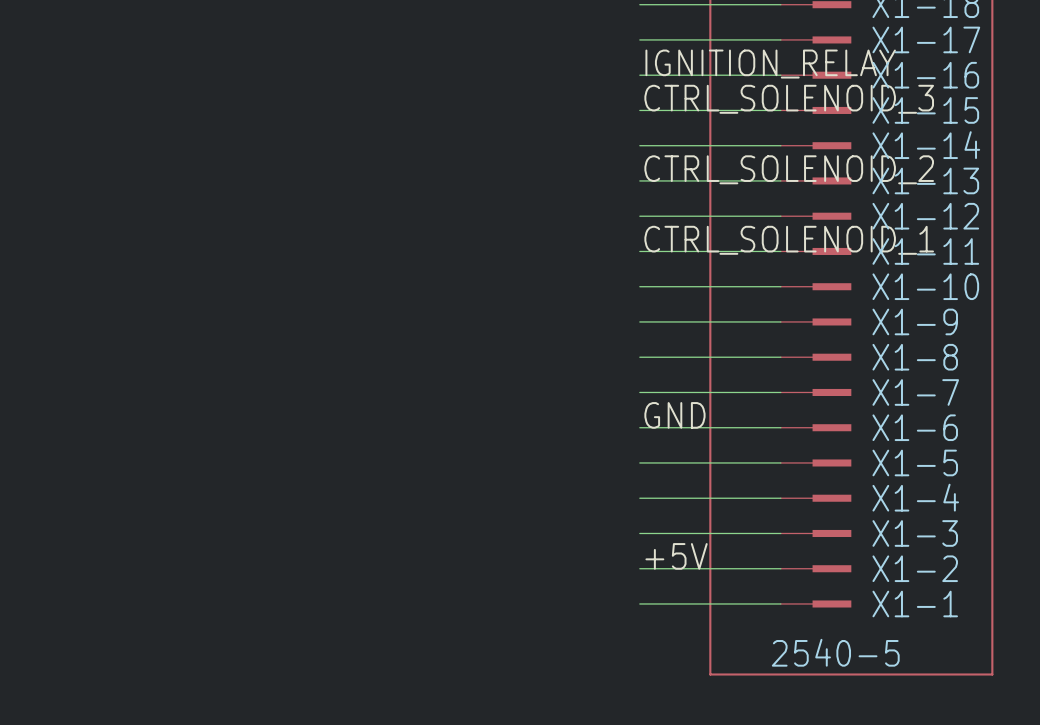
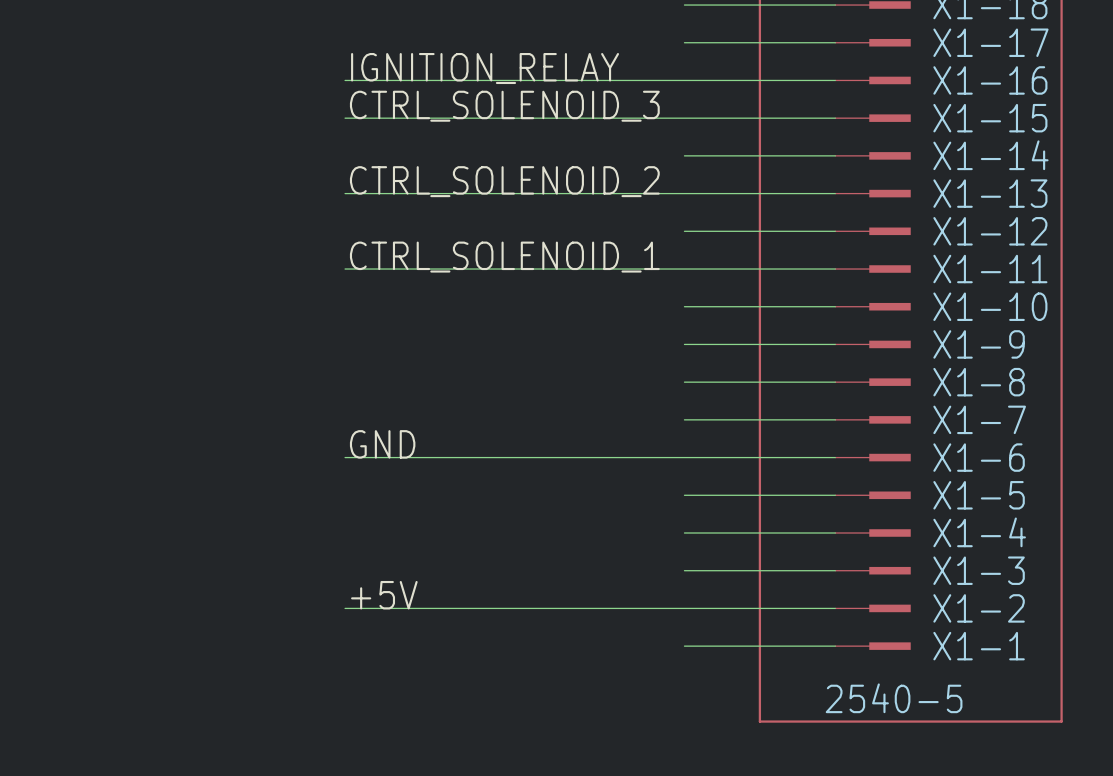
label position: IGNITION_RELAY (770, 64) -> IGNITION_RELAY (485, 68)
wire: none -> (345, 80) (684, 80)
label position: CTRL_SOLENOID_3 (789, 99) -> CTRL_SOLENOID_3 (504, 106)
wire: none -> (345, 118) (684, 118)
label position: CTRL_SOLENOID_2 (789, 169) -> CTRL_SOLENOID_2 (504, 181)
wire: none -> (345, 193) (684, 193)
label position: CTRL_SOLENOID_1 (789, 240) -> CTRL_SOLENOID_1 (504, 257)
wire: none -> (345, 269) (684, 269)
label position: GND (674, 415) -> GND (382, 444)
wire: none -> (345, 457) (684, 457)
label position: +5V (676, 556) -> +5V (384, 595)
wire: none -> (345, 608) (684, 608)

